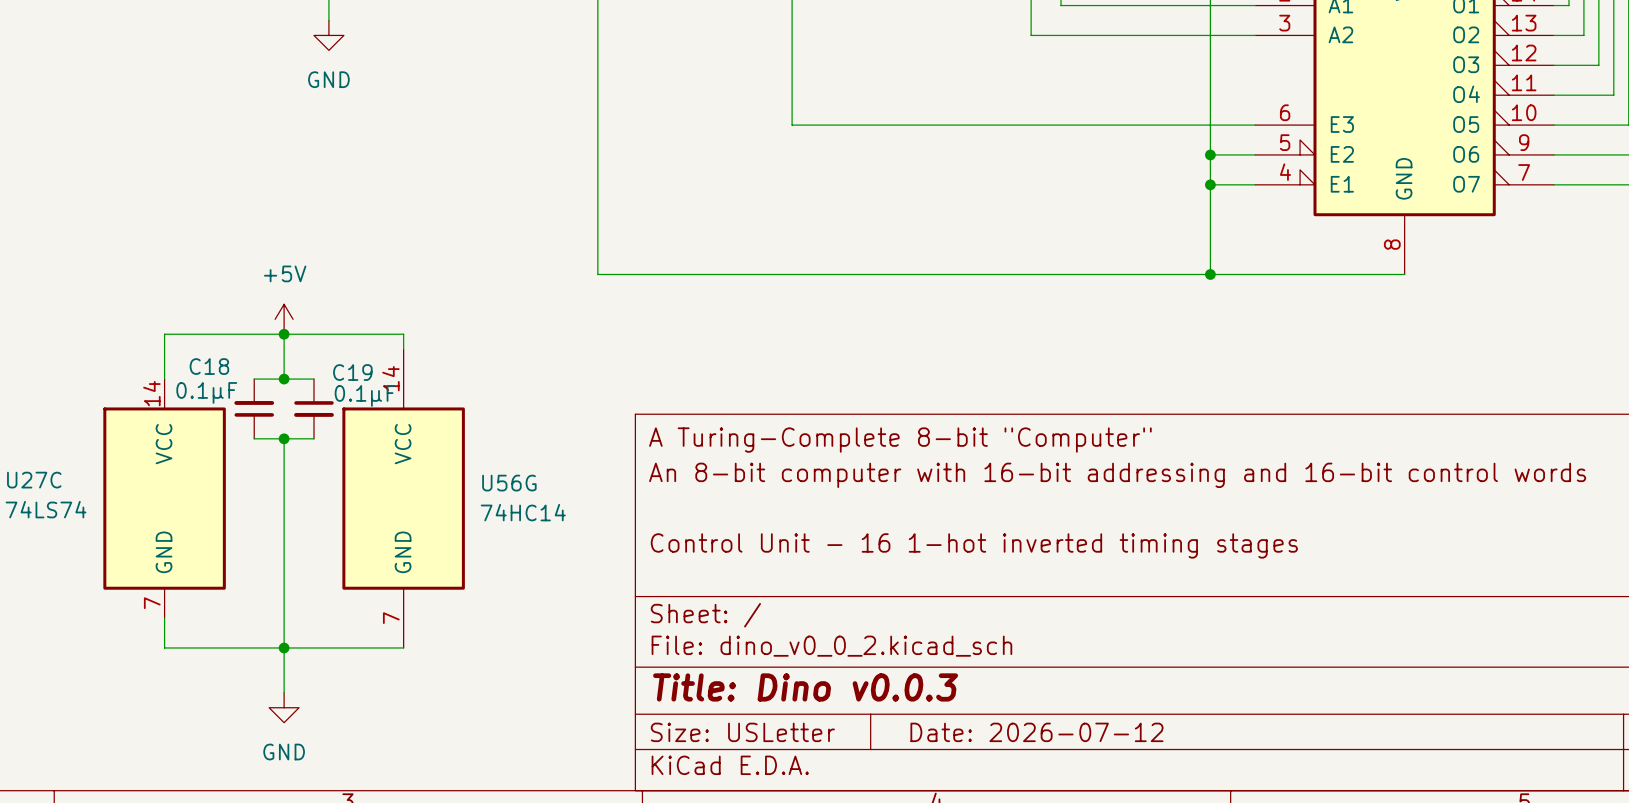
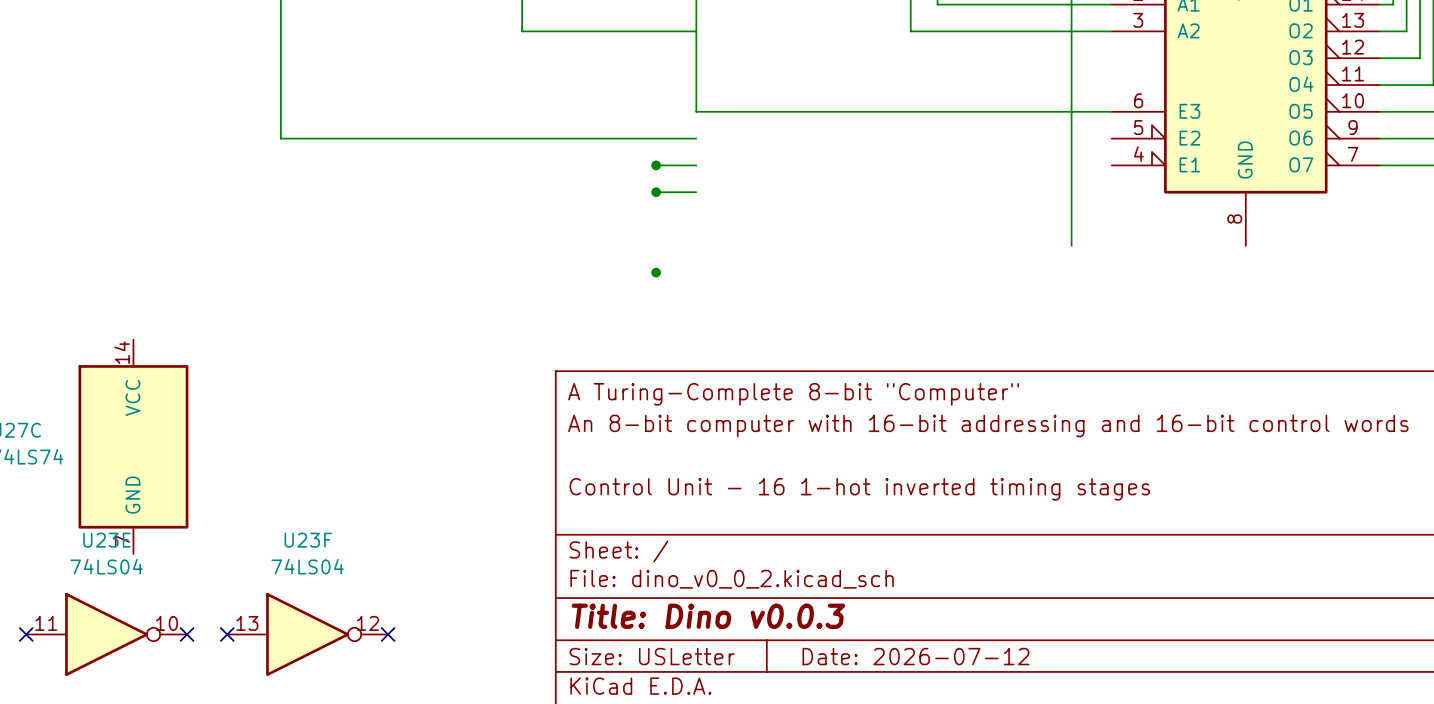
wire: none -> (280, 17) (280, 138) (696, 138)
power symbol: GND (328, 35) -> none
wire: (597, 35) (597, 274) (1404, 274) -> (522, 31) (696, 31)
wire: (1210, 154) (1255, 154) -> none
junction: (1210, 154) -> none
wire: none -> (656, 165) (696, 165)
junction: none -> (656, 165)
wire: (1210, 184) (1255, 184) -> none
junction: (1210, 184) -> none
wire: none -> (656, 192) (696, 192)
junction: none -> (656, 192)
junction: (1210, 274) -> none
junction: none -> (656, 272)
power symbol: +5V (284, 319) -> none
wire: (284, 334) (284, 379) -> none
junction: (284, 334) -> none
wire: (403, 349) (403, 334) (164, 334) (164, 379) -> none
wire: (254, 379) (313, 379) -> none
junction: (284, 379) -> none
C18: 0.1µF (254, 408) -> none
C19: 0.1µF (313, 408) -> none
wire: (254, 438) (313, 438) -> none
wire: (284, 438) (284, 692) -> none
junction: (284, 438) -> none
U56G: 74HC14 (403, 498) -> none
wire: (164, 618) (164, 647) (403, 647) -> none
junction: (284, 647) -> none
no-connect mark: none -> (26, 634)
U23E: none -> 74LS04 (106, 634)
no-connect mark: none -> (187, 634)
no-connect mark: none -> (227, 634)
power symbol: GND (284, 707) -> none
U23F: none -> 74LS04 (307, 634)
no-connect mark: none -> (388, 634)

